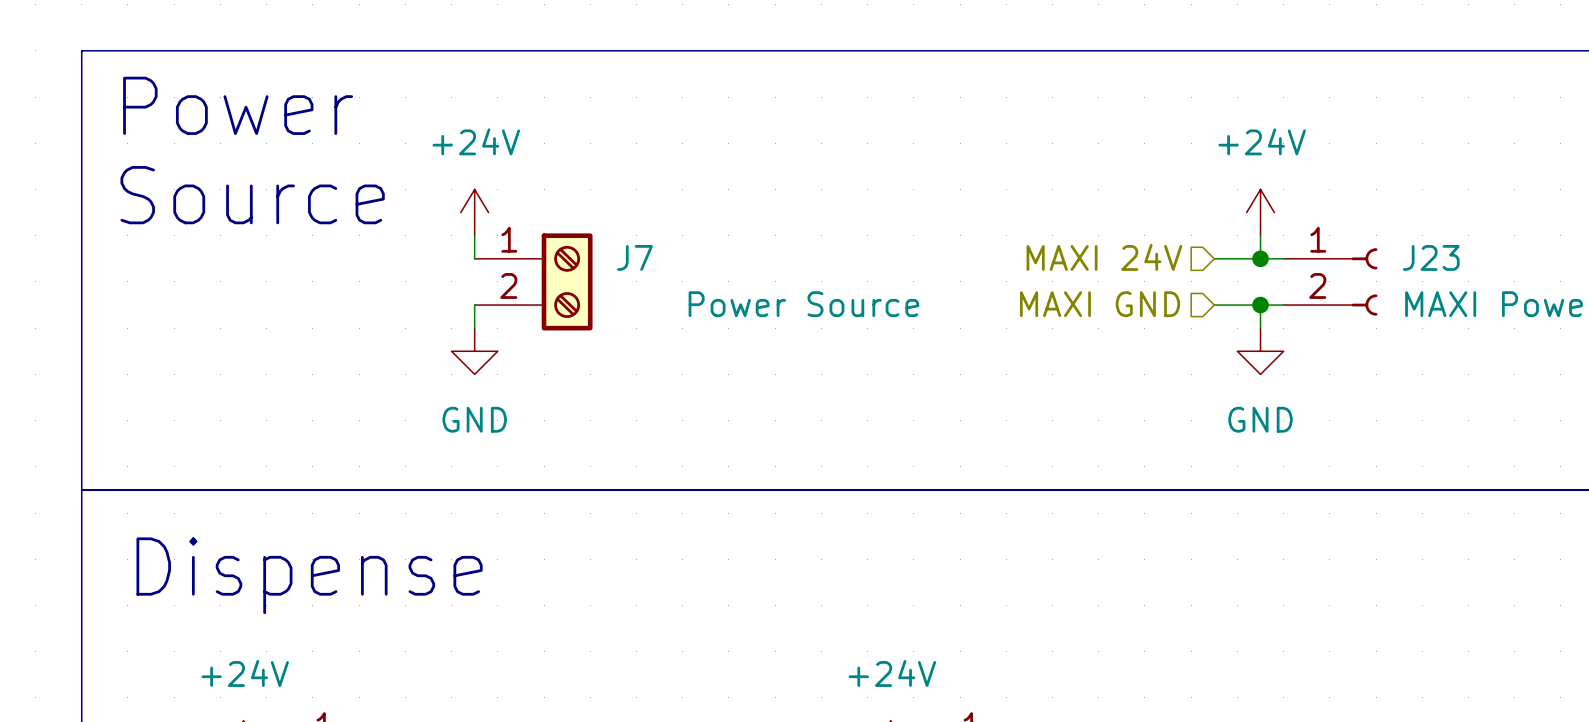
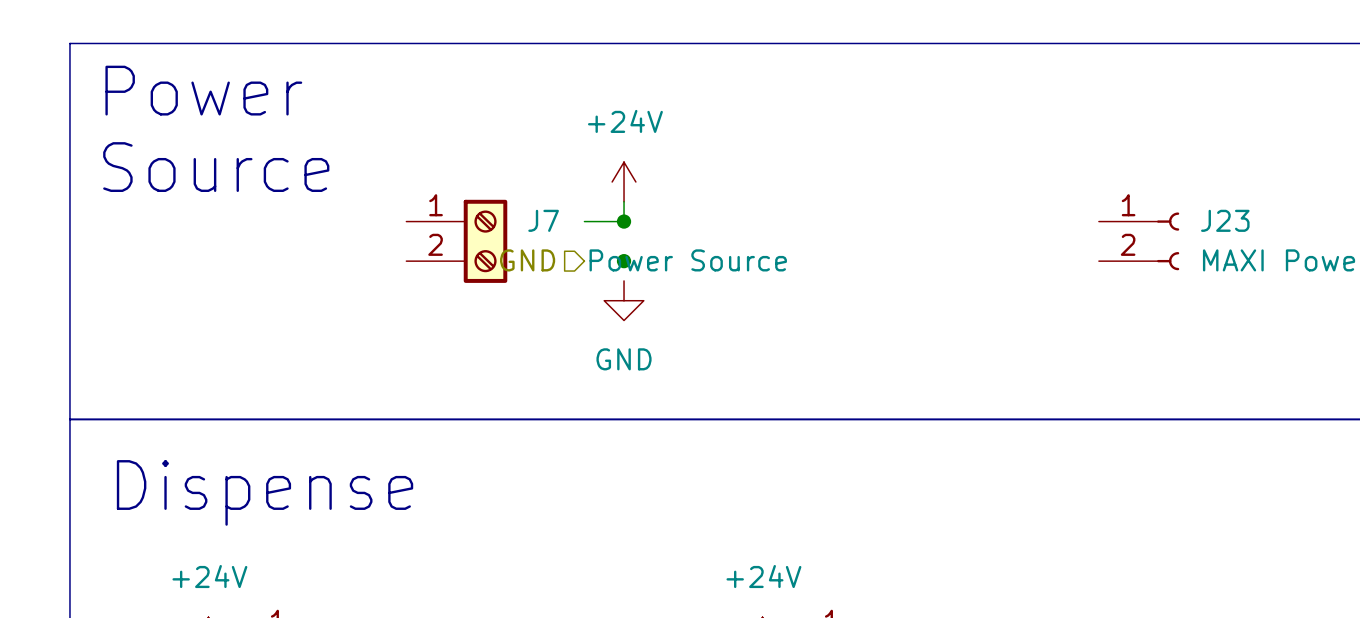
power symbol position: +24V (474, 212) -> +24V (624, 181)
power symbol: +24V (1260, 212) -> none
wire: (474, 235) (474, 258) -> none
wire: none -> (624, 201) (624, 221) (584, 221)
wire: (1260, 235) (1260, 258) -> none
hierarchical label: MAXI 24V (1104, 257) -> none
junction: none -> (624, 221)
wire: (1214, 258) (1283, 258) -> none
junction: (1260, 258) -> none
hierarchical label: none -> GND (527, 260)
hierarchical label: MAXI GND (1100, 304) -> none
wire: (474, 305) (474, 328) -> none
junction: none -> (624, 261)
wire: (1214, 305) (1283, 305) -> none
wire: (1260, 305) (1260, 328) -> none
junction: (1260, 305) -> none
power symbol position: GND (474, 351) -> GND (624, 300)
power symbol: GND (1260, 351) -> none

